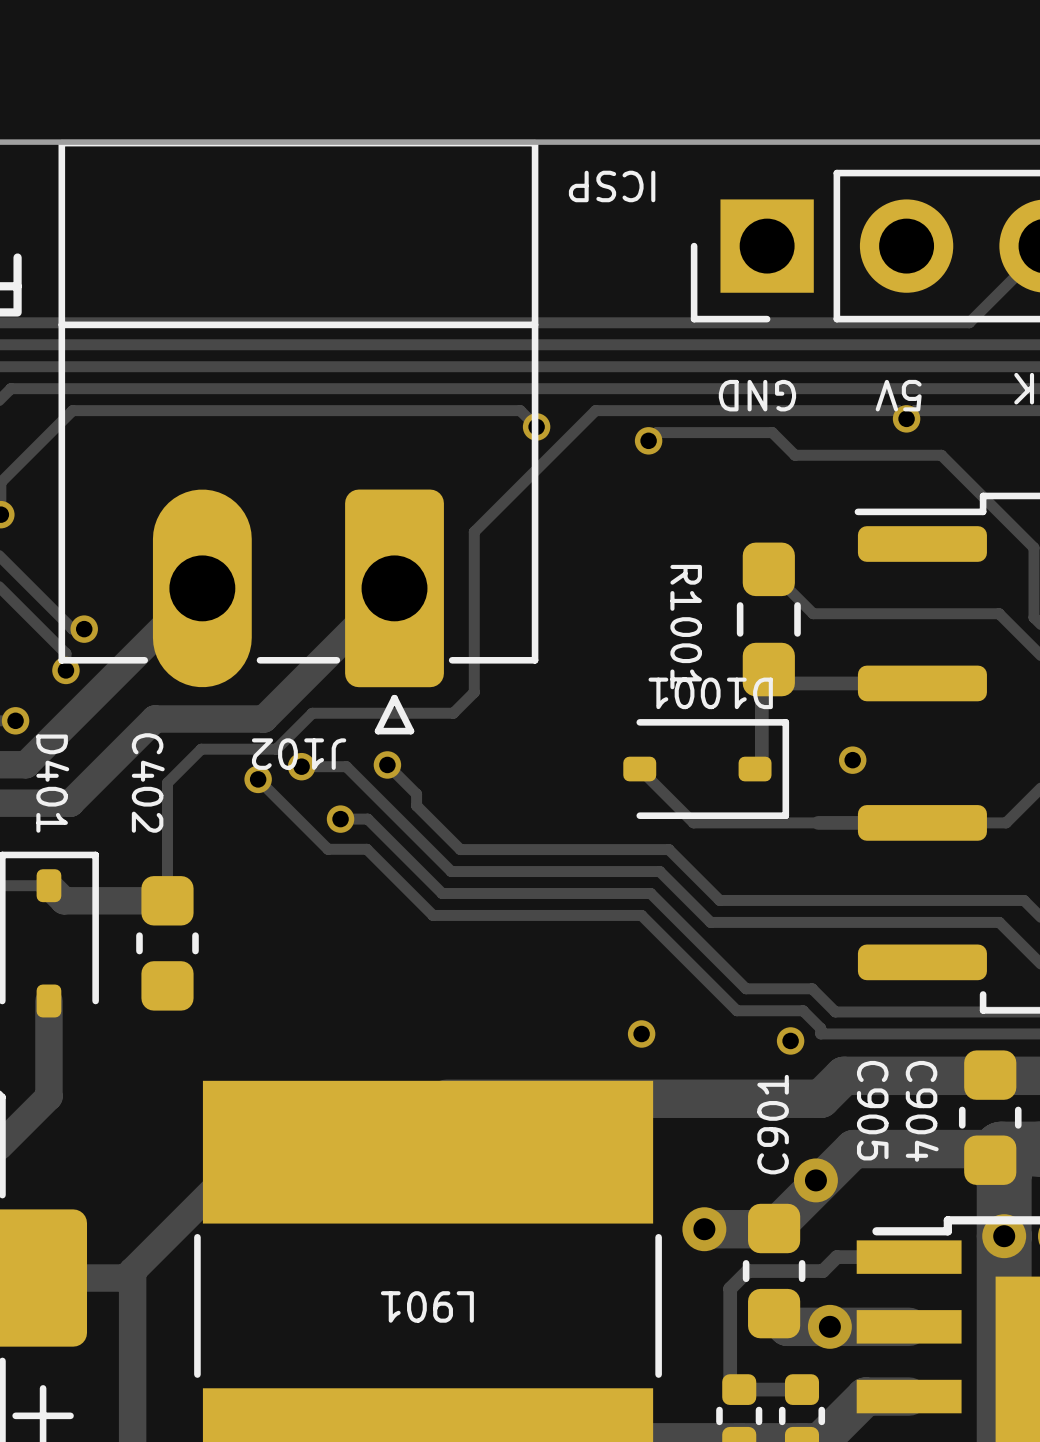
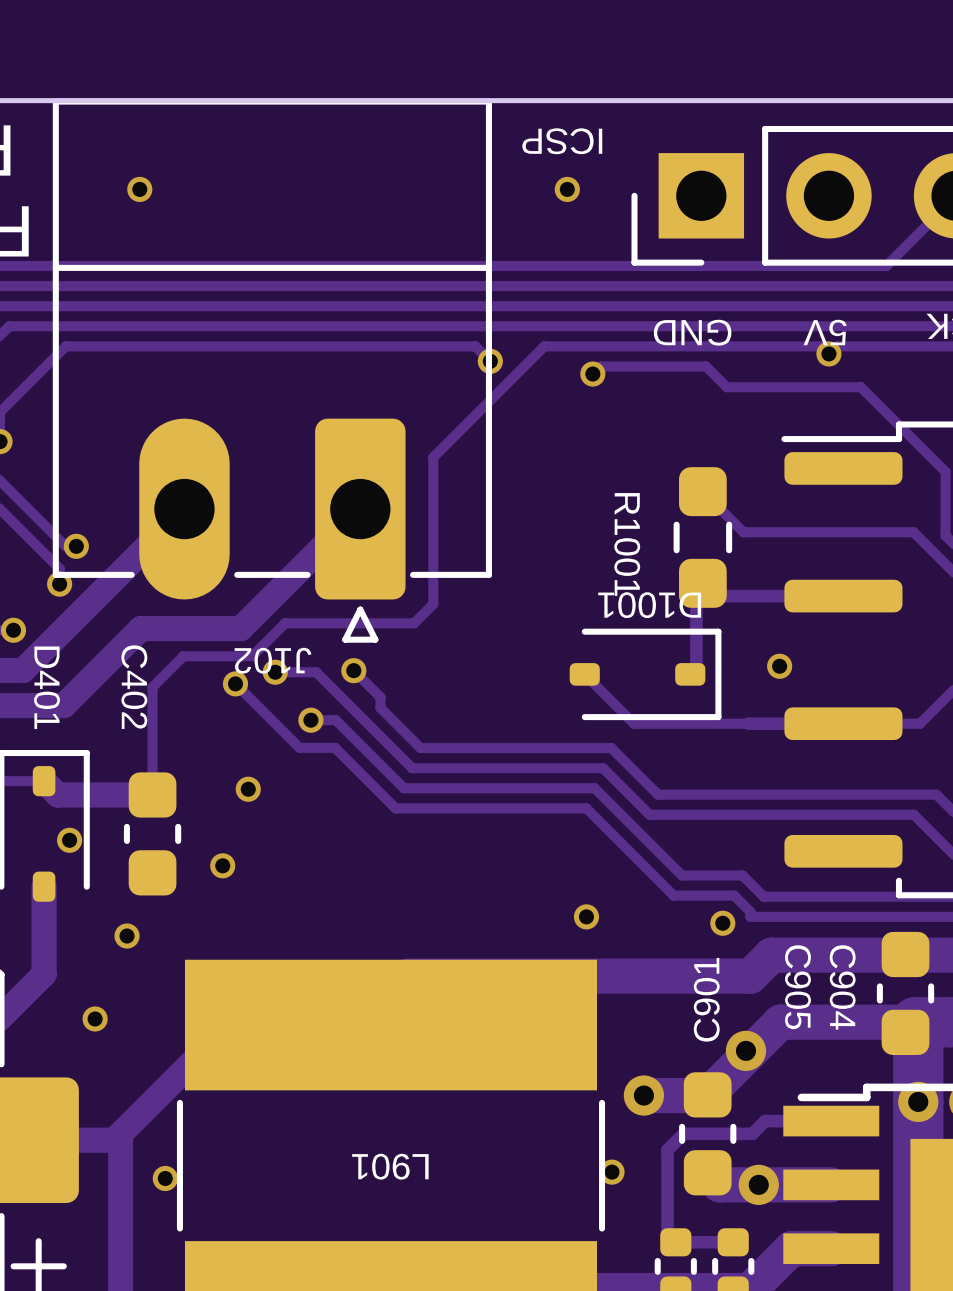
via: none -> (139, 189)
via: none -> (567, 189)
via: none -> (248, 789)
via: none -> (69, 840)
via: none -> (222, 865)
via: none -> (127, 936)
via: none -> (95, 1018)
via: none -> (611, 1172)
via: none -> (165, 1178)

